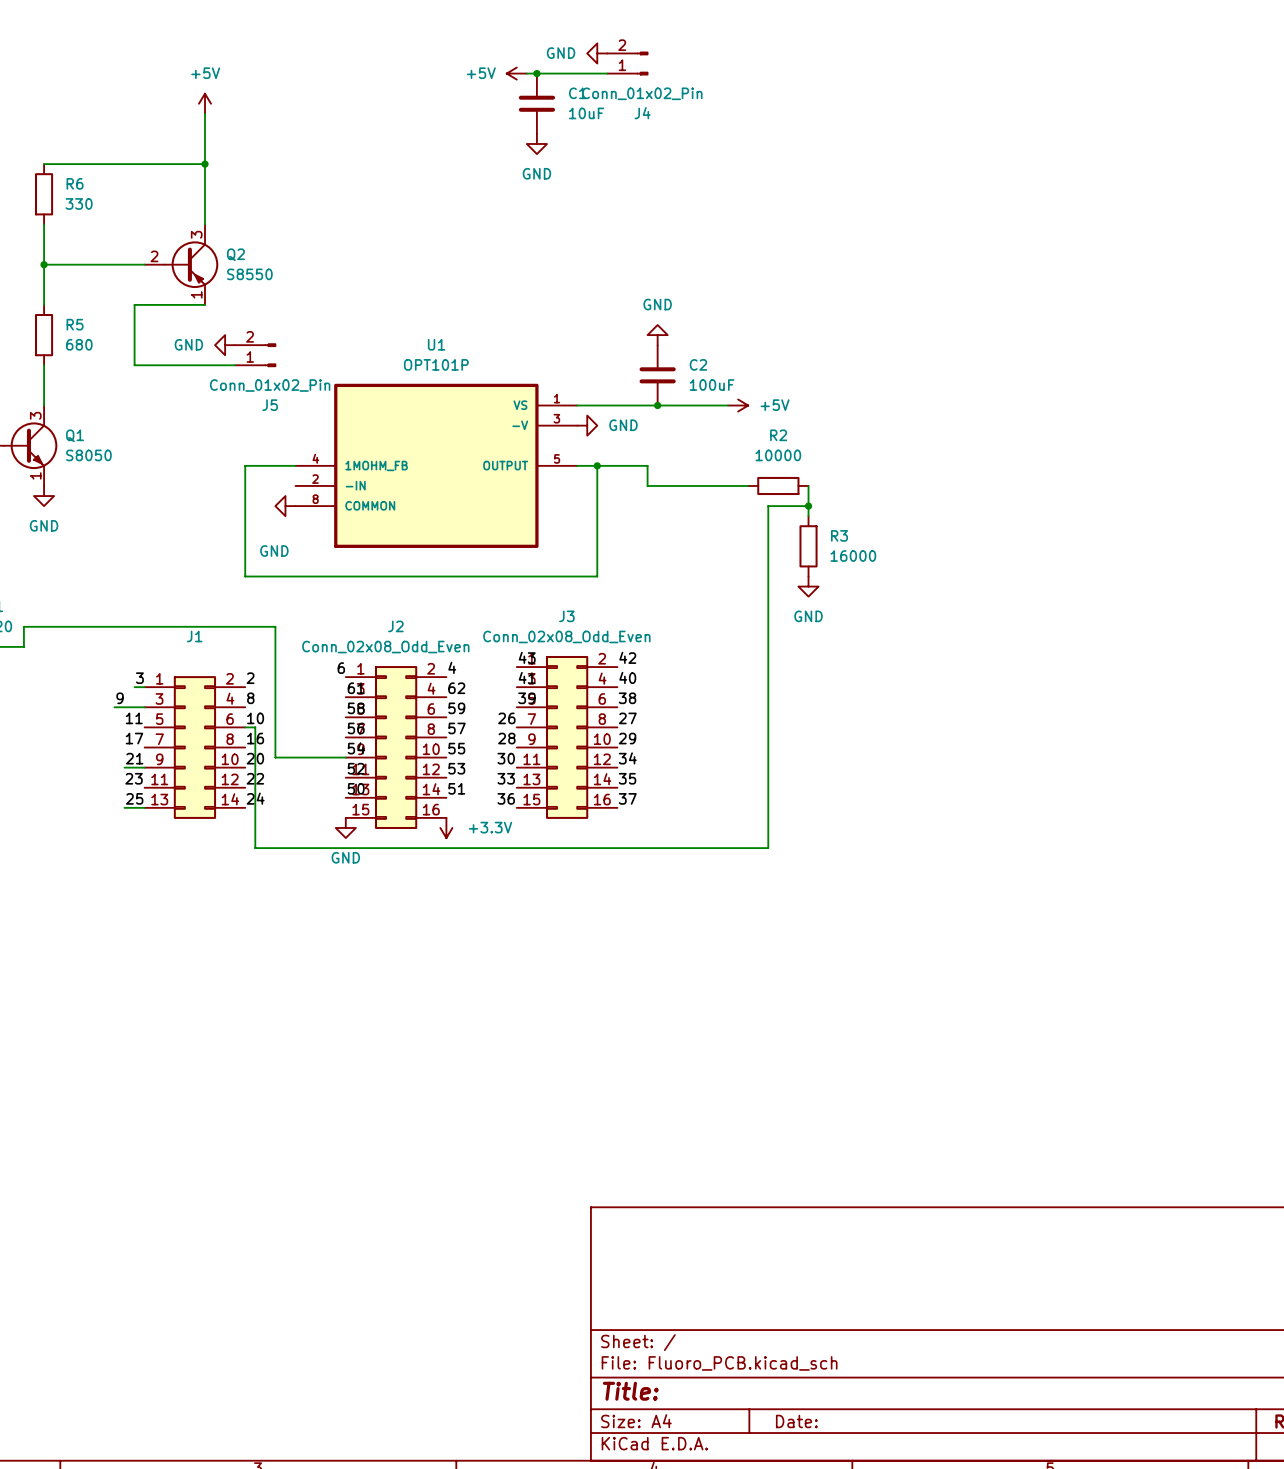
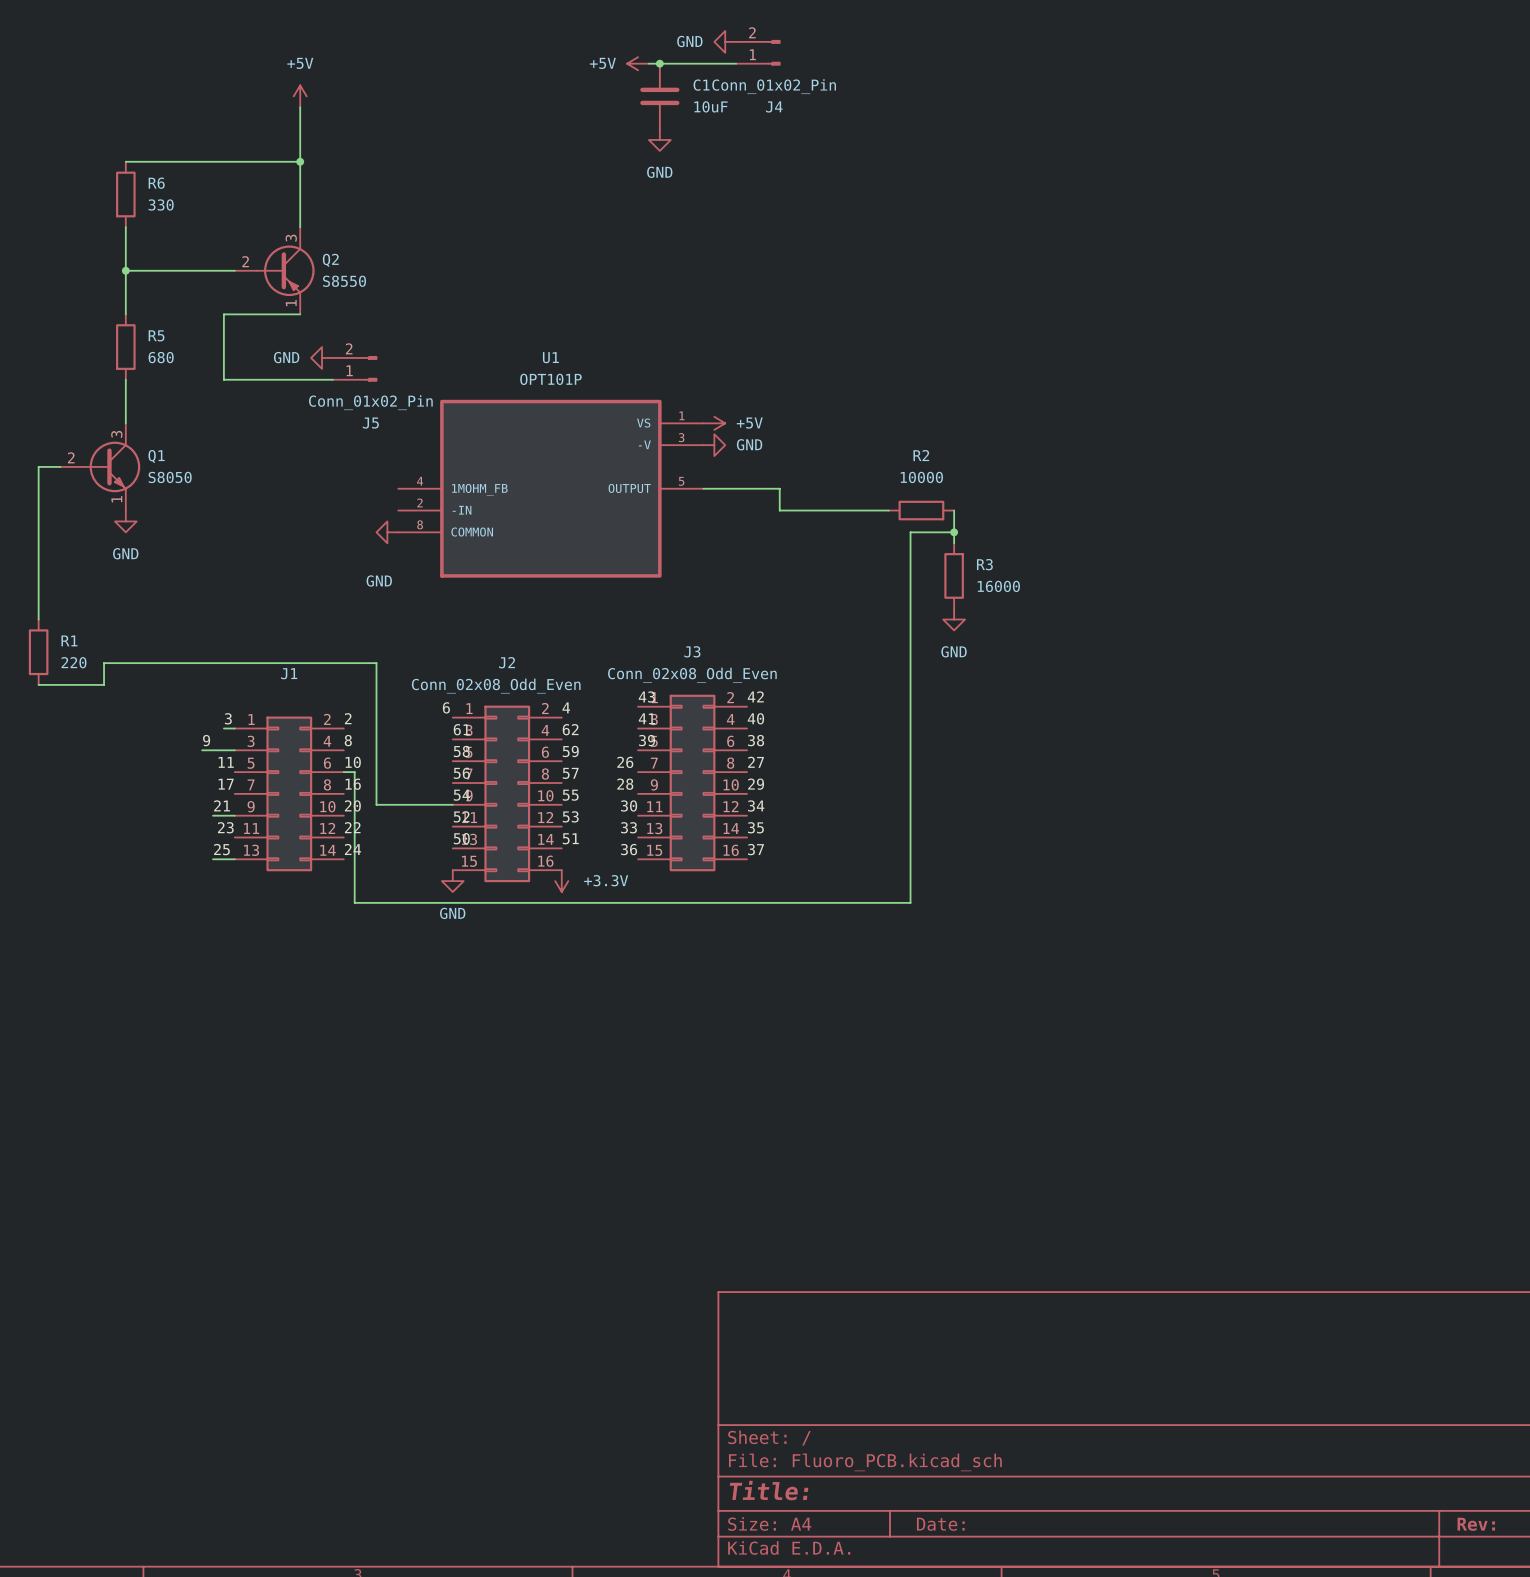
power symbol: GND (657, 335) -> none
C2: 100uF (657, 375) -> none
wire: (577, 405) (728, 405) -> none
junction: (657, 405) -> none
power symbol position: +5V (738, 405) -> +5V (714, 423)
wire: (295, 465) (245, 465) (245, 576) (597, 576) (597, 465) -> none
junction: (597, 465) -> none

